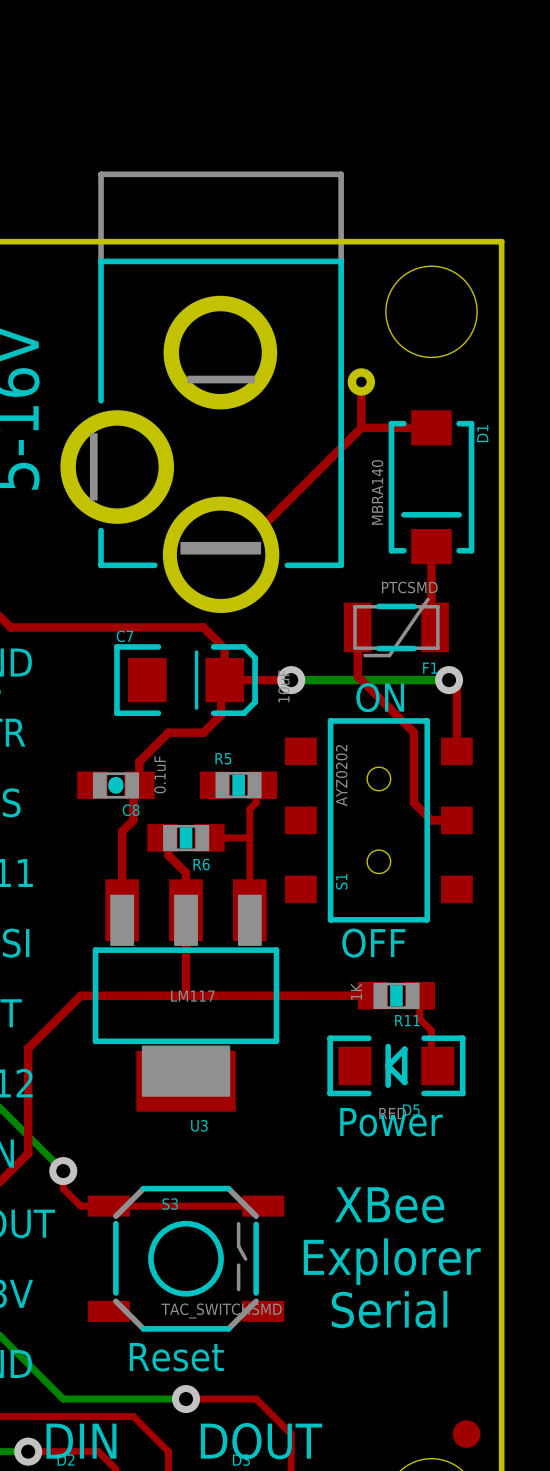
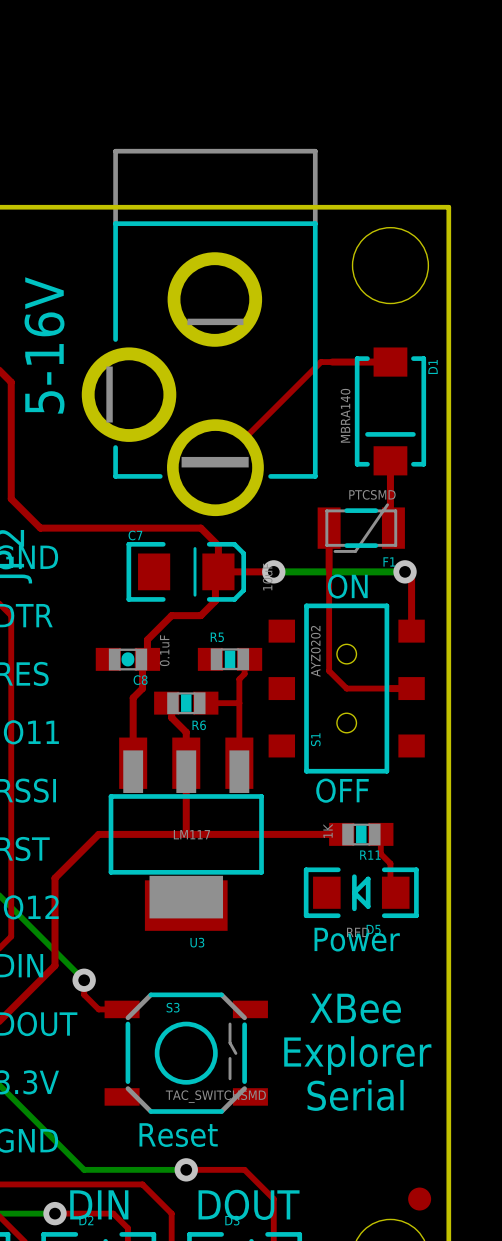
top track: (361, 381) (361, 427) (234, 554) (221, 554) -> (332, 362) (321, 362) (215, 467)
part: (361, 381) -> none
top track: (357, 676) (413, 732) (413, 802) (431, 820) -> (329, 568) (329, 670) (346, 688) (390, 688)
top track: (108, 1206) (273, 1206) -> none

